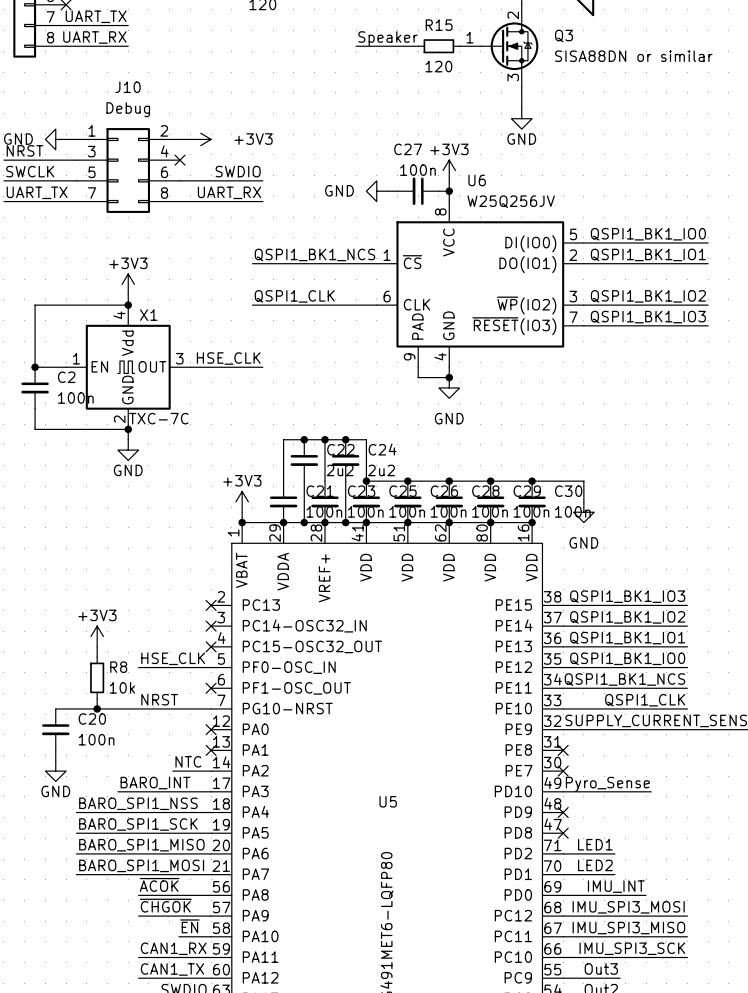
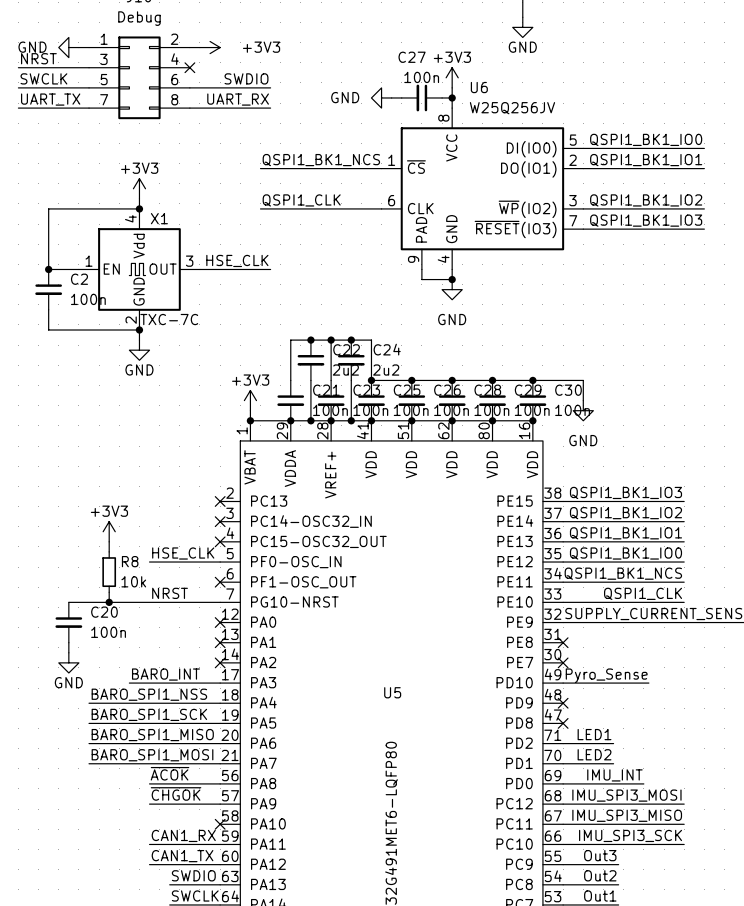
label: NTC (188, 761) -> none
wire: (172, 771) (211, 771) -> none
no-connect mark: none -> (220, 662)
label: ~{EN} (189, 926) -> none
wire: (178, 936) (211, 936) -> none
no-connect mark: none -> (220, 824)

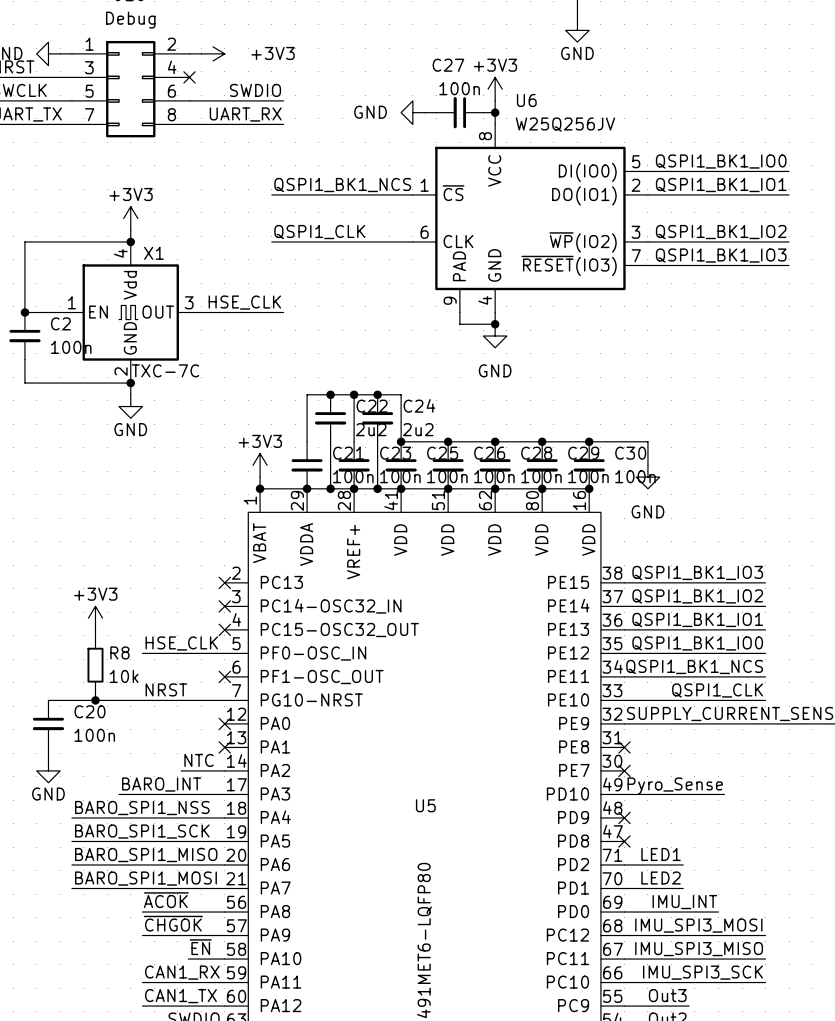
label: none -> NTC (199, 760)
wire: none -> (181, 770) (224, 770)
no-connect mark: (220, 662) -> none
label: none -> ~{EN} (200, 947)
wire: none -> (188, 959) (224, 959)
no-connect mark: (220, 824) -> none

